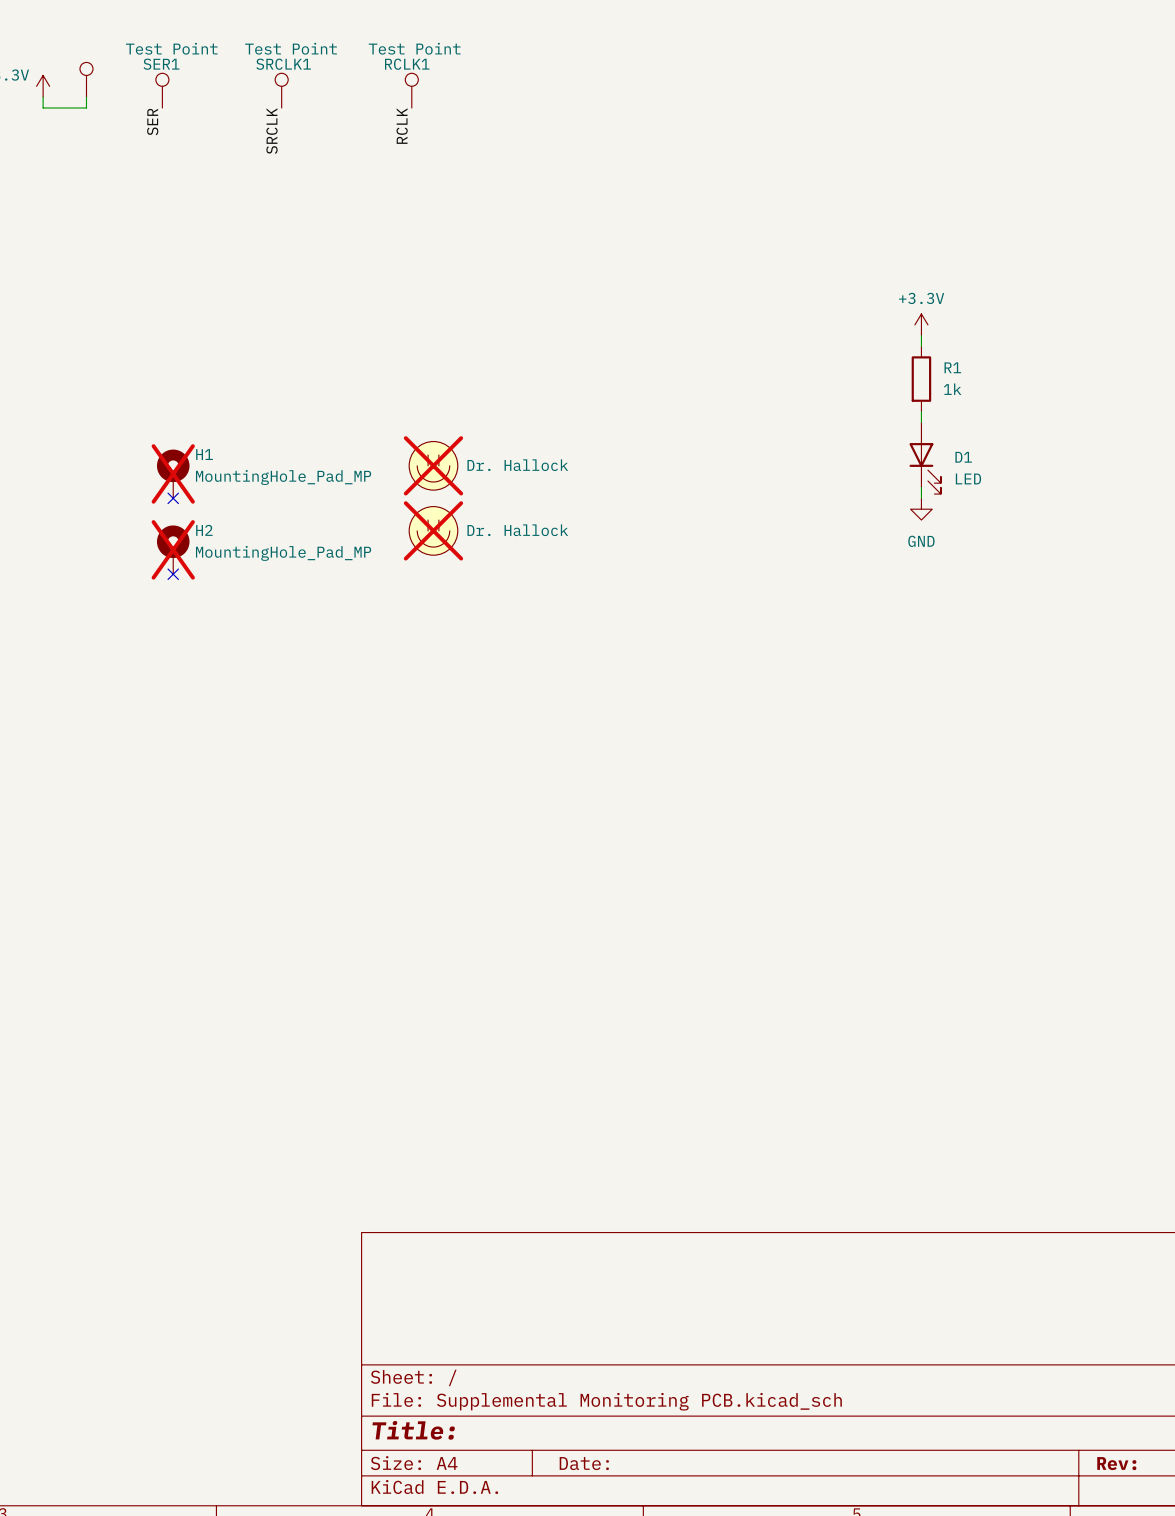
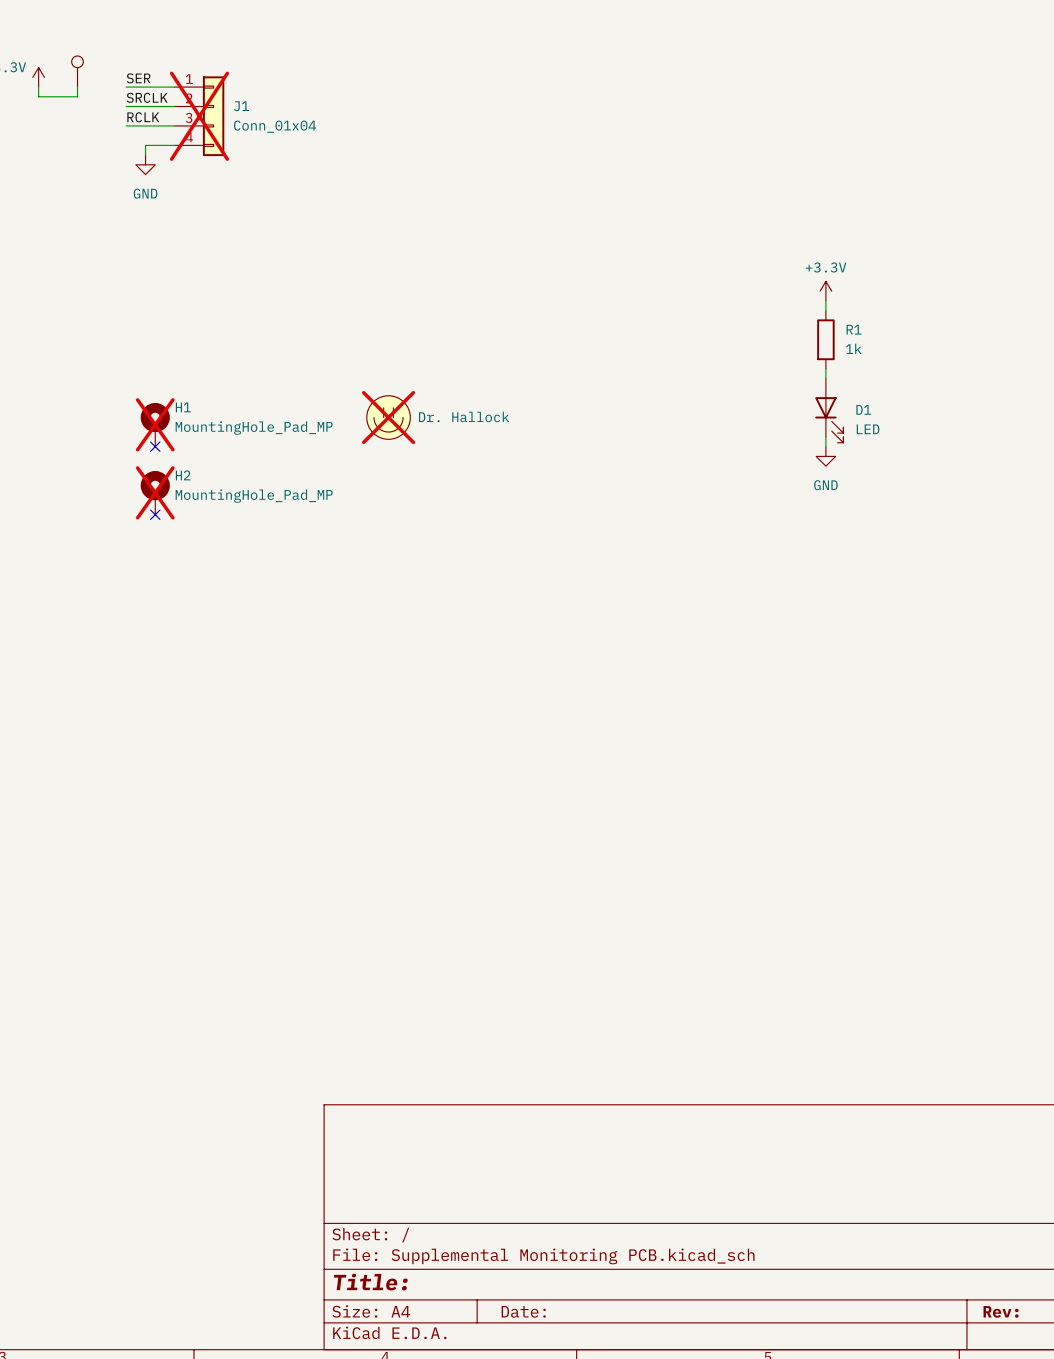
SER1: Test Point (162, 90) -> none
SRCLK1: Test Point (281, 90) -> none
RCLK1: Test Point (411, 90) -> none
wire: none -> (126, 87) (174, 87)
wire: none -> (126, 106) (174, 106)
label rotation: 0° (152, 122) -> 90° clockwise (138, 78)
label position: SER (152, 122) -> SER (138, 78)
label: RCLK (402, 126) -> none
J1: none -> Conn_01x04 (199, 116)
label: none -> RCLK (143, 117)
label rotation: 0° (271, 131) -> 90° clockwise (147, 97)
label position: SRCLK (271, 131) -> SRCLK (147, 97)
wire: none -> (126, 125) (174, 125)
wire: none -> (174, 145) (145, 145) (145, 155)
power symbol: none -> GND (145, 164)
part: Dr. Hallock (433, 530) -> none

